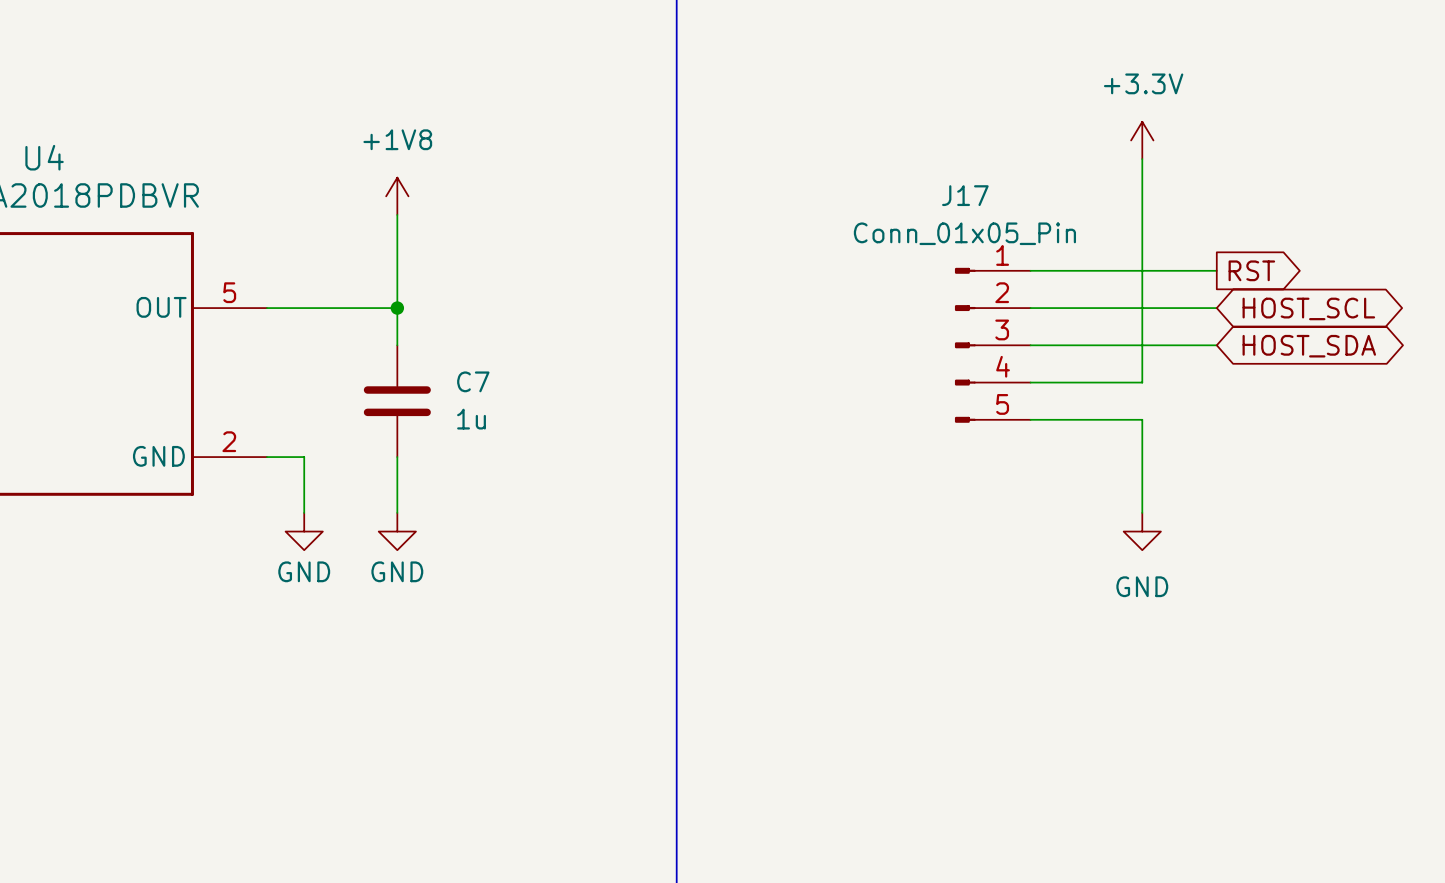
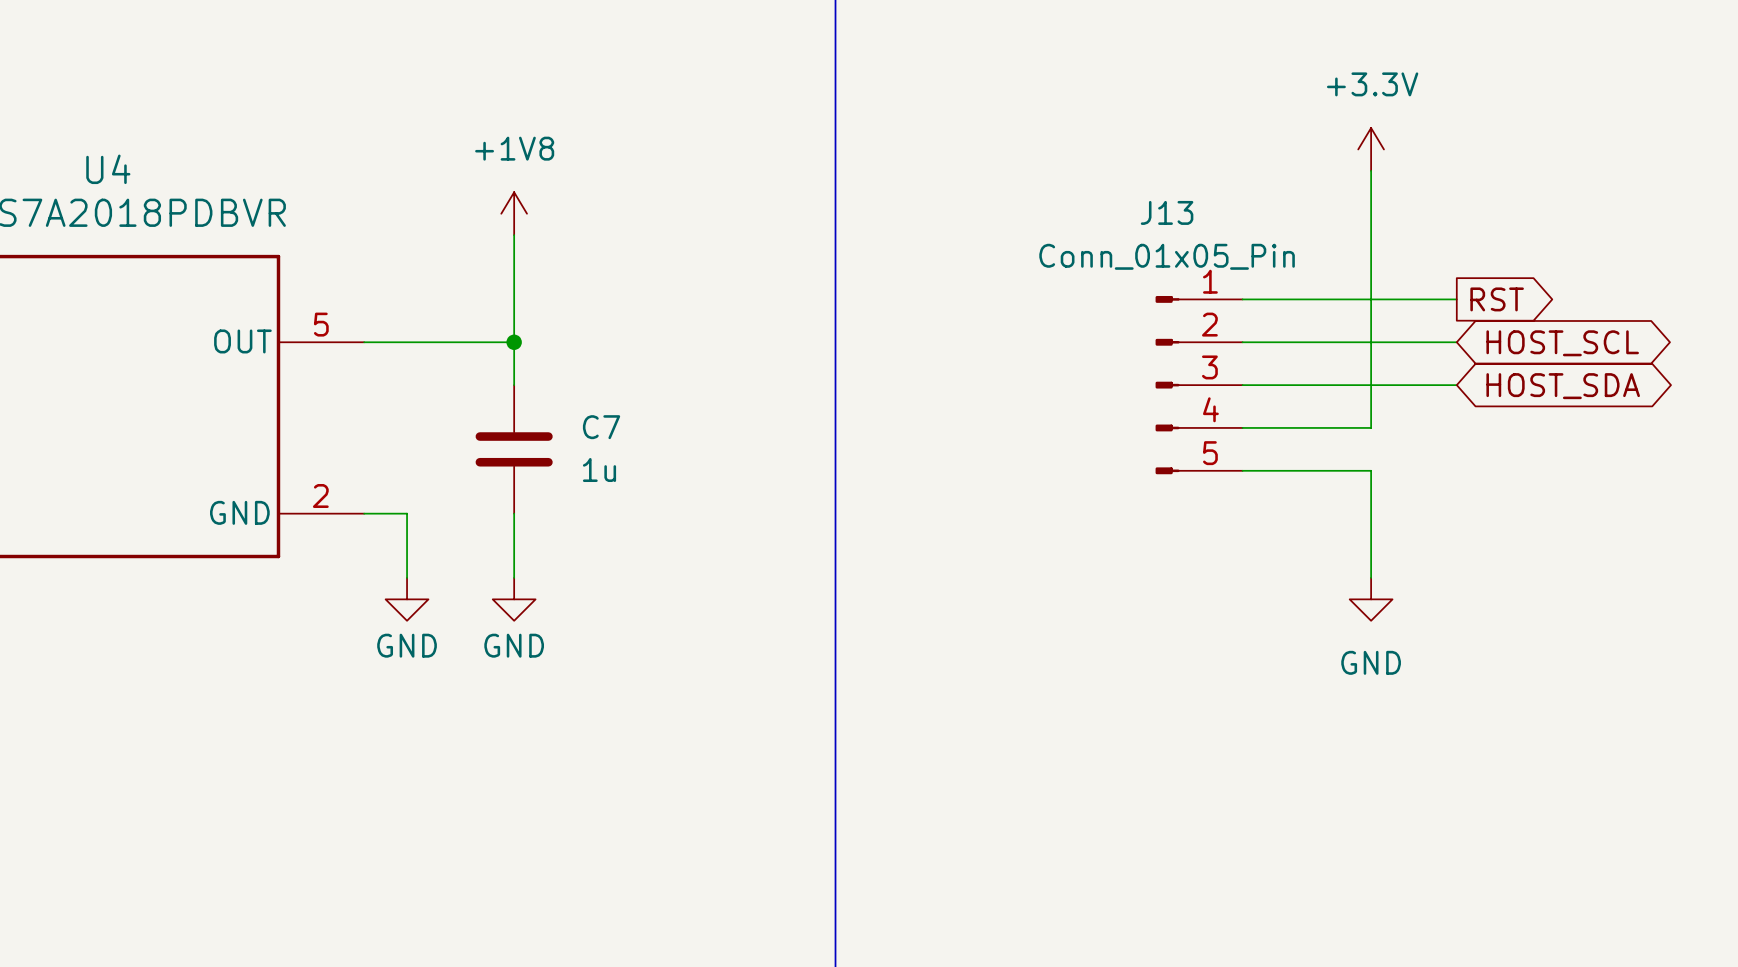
J17 name: J17 (965, 195) -> J13 (1167, 212)

